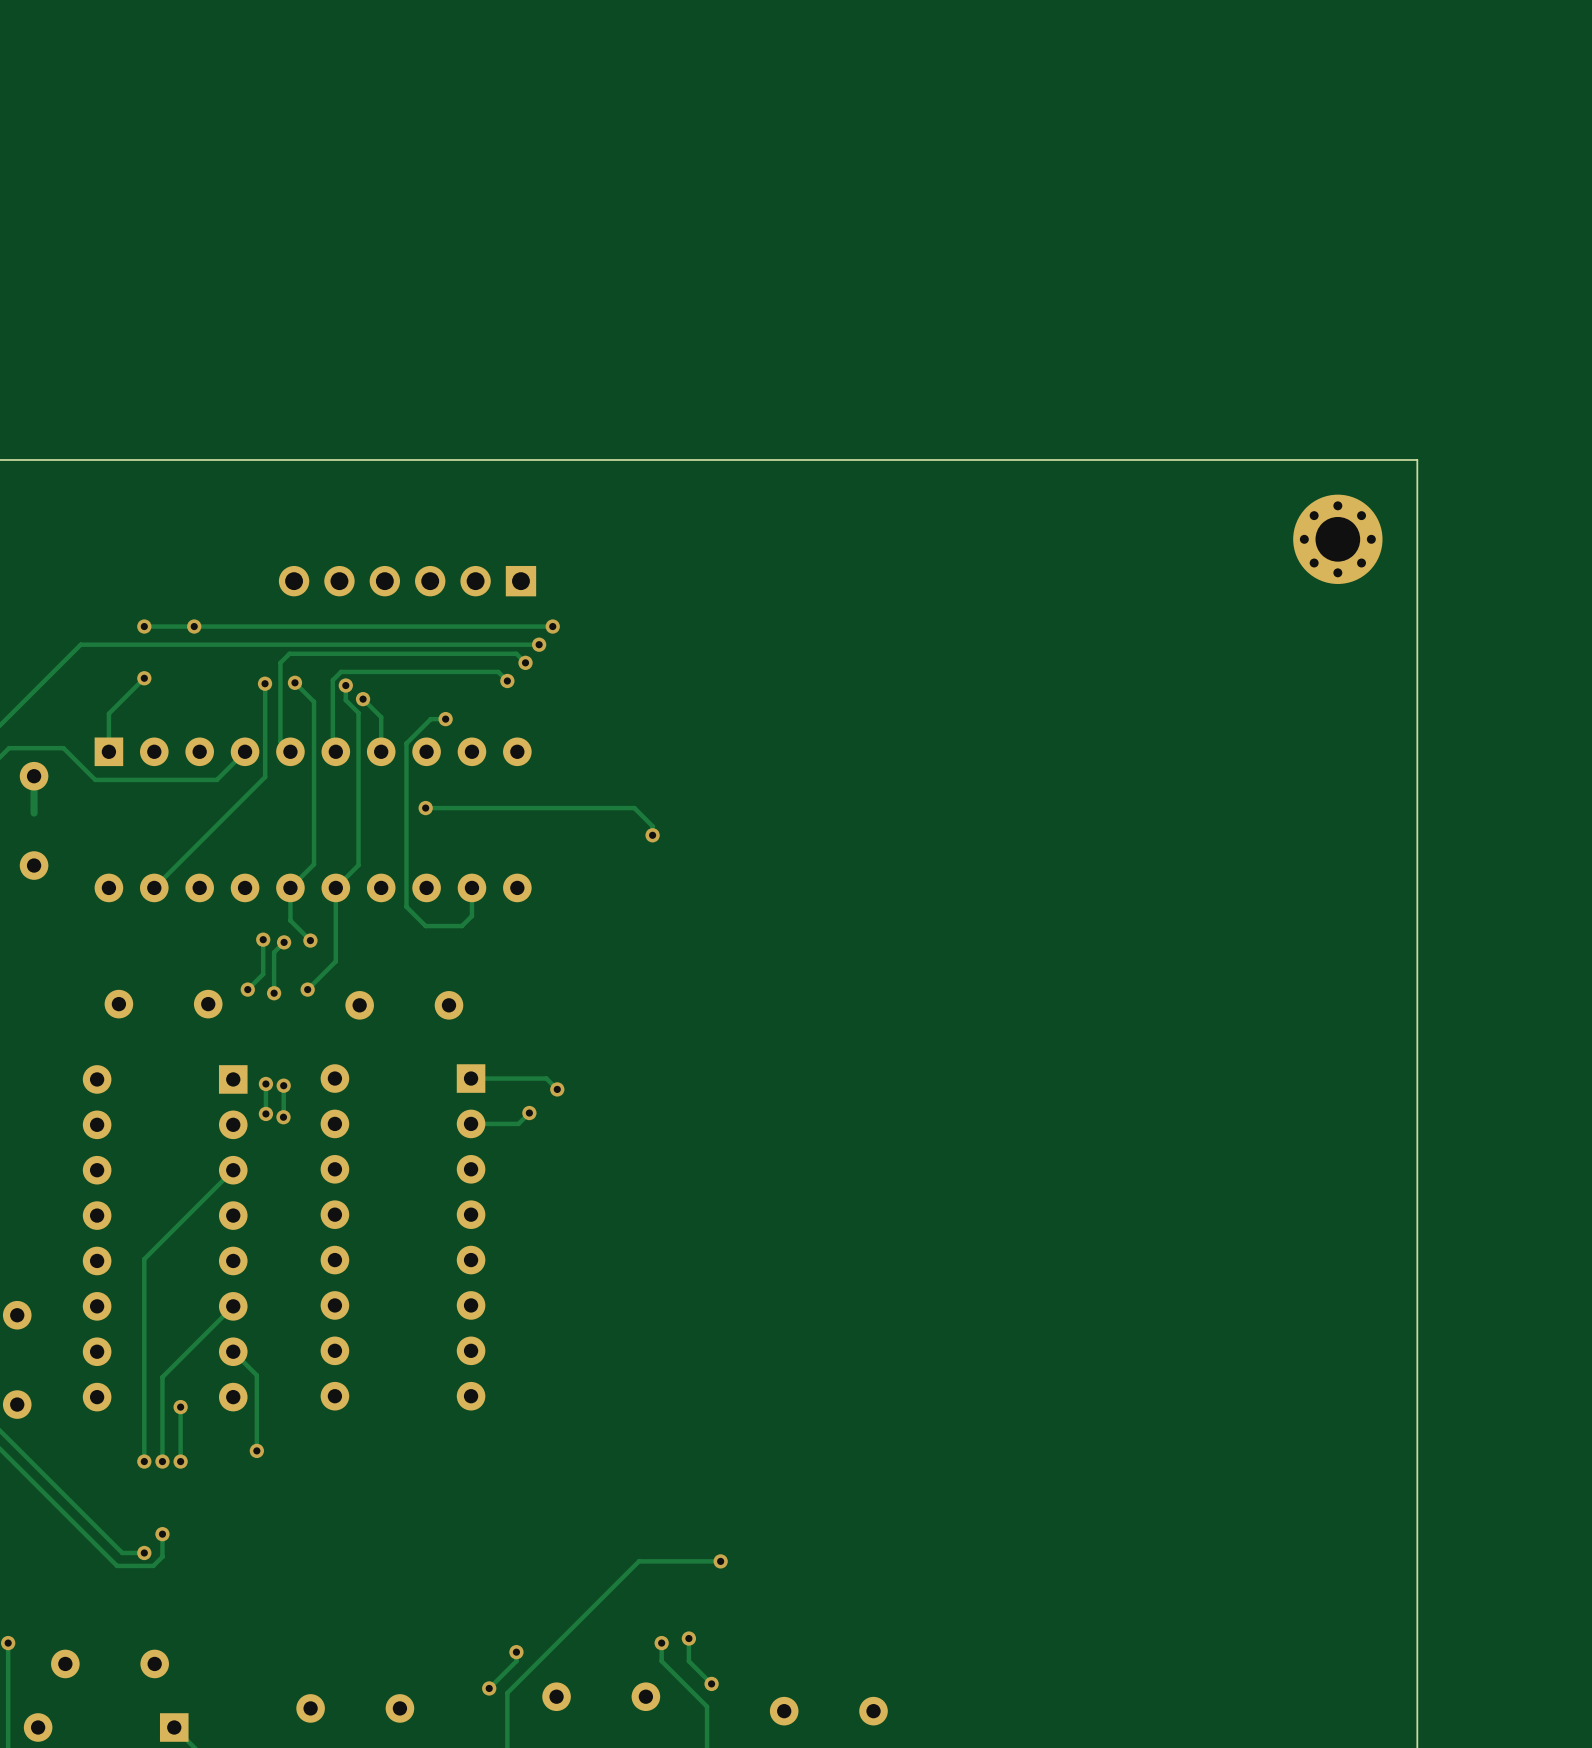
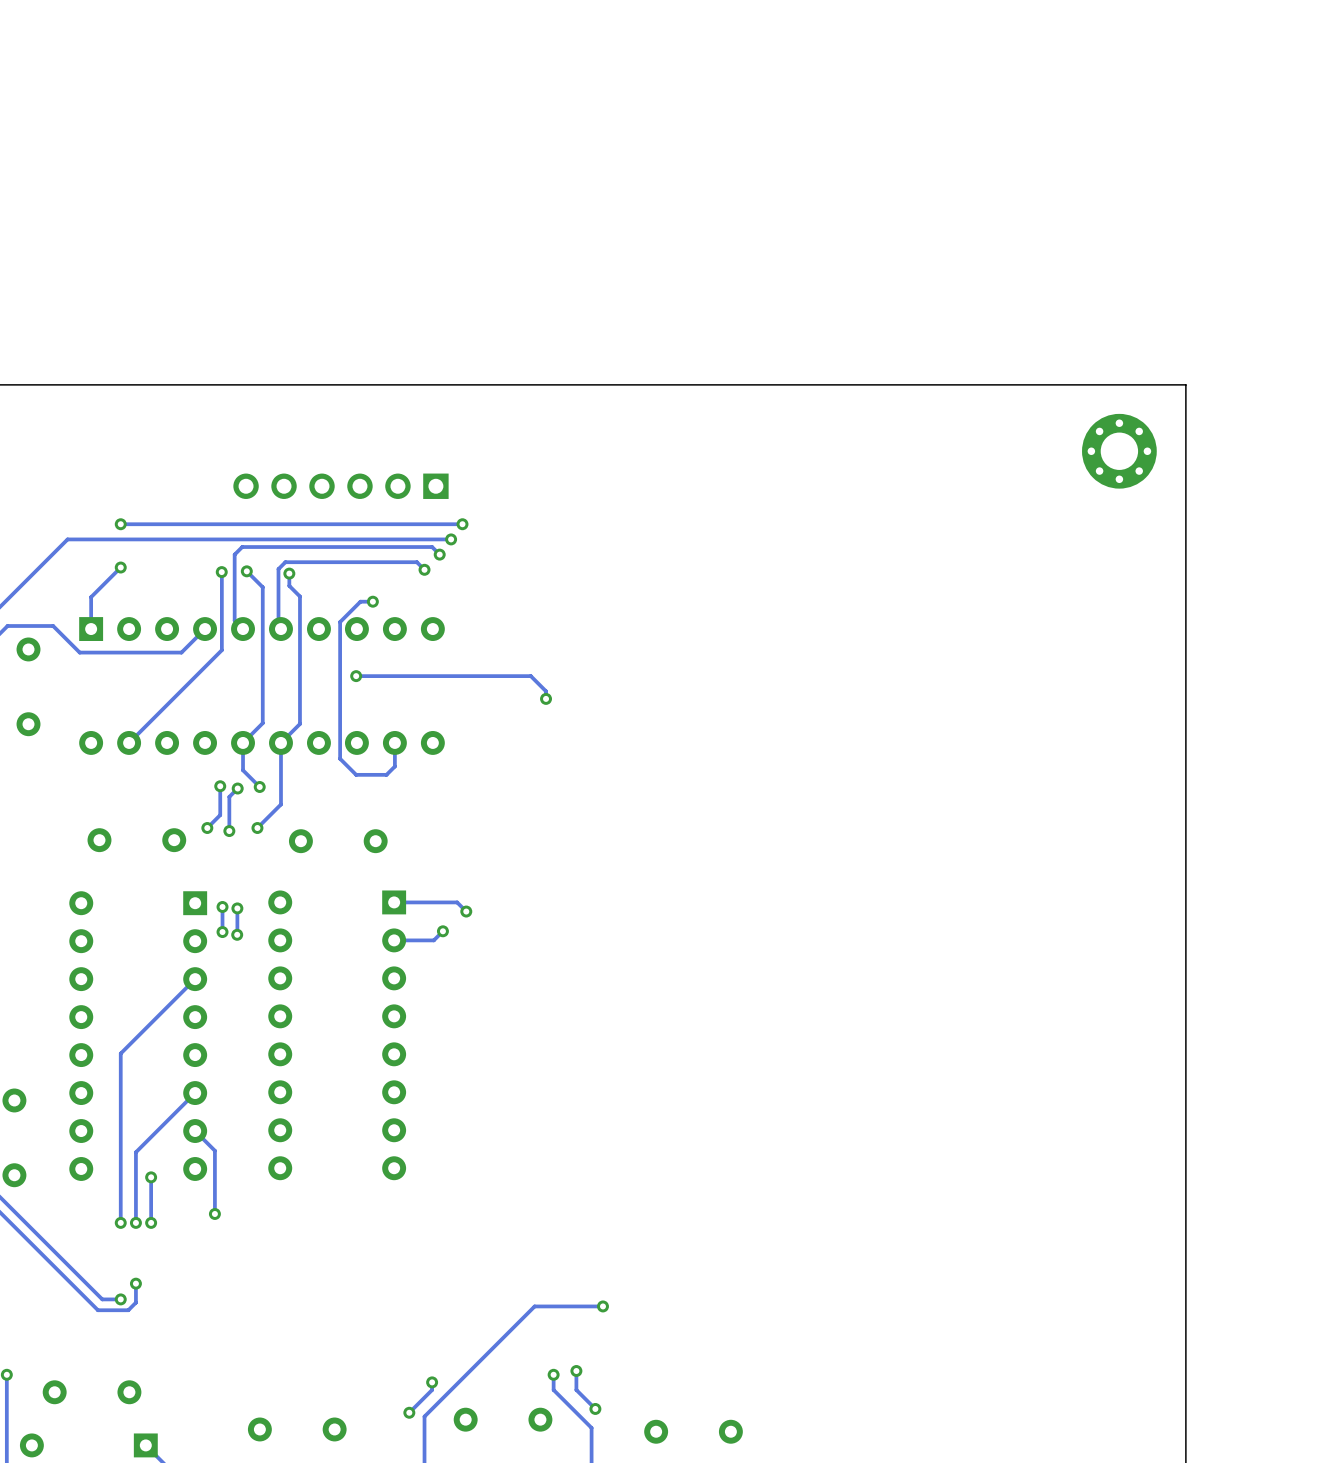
via: (194, 626) -> none
track: (363, 699) (381, 717) (381, 751) -> none
via: (363, 699) -> none
track: (34, 776) (34, 813) -> none

